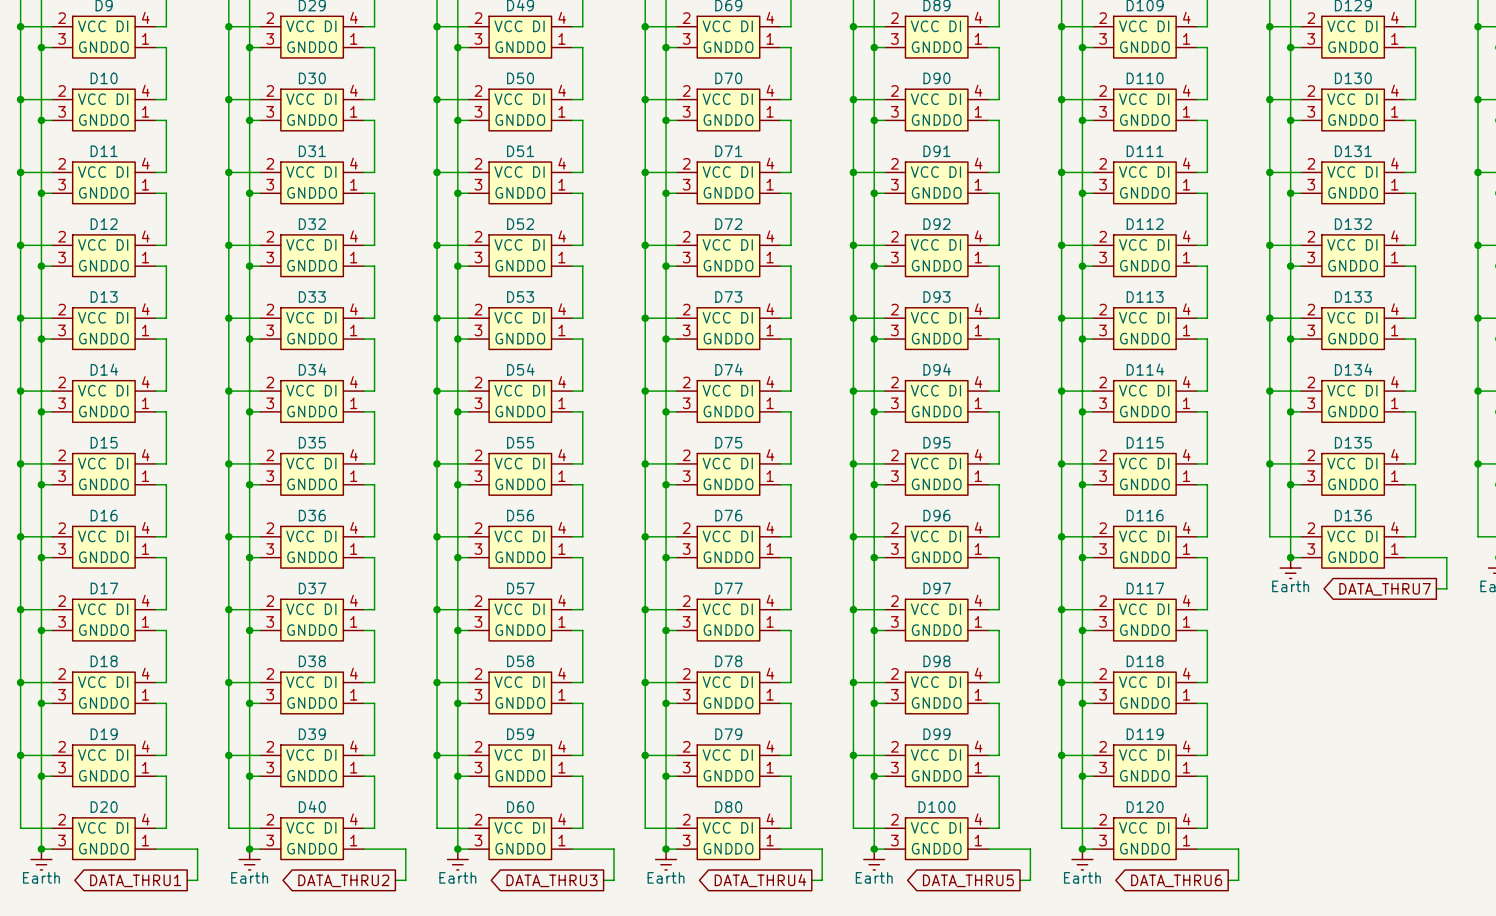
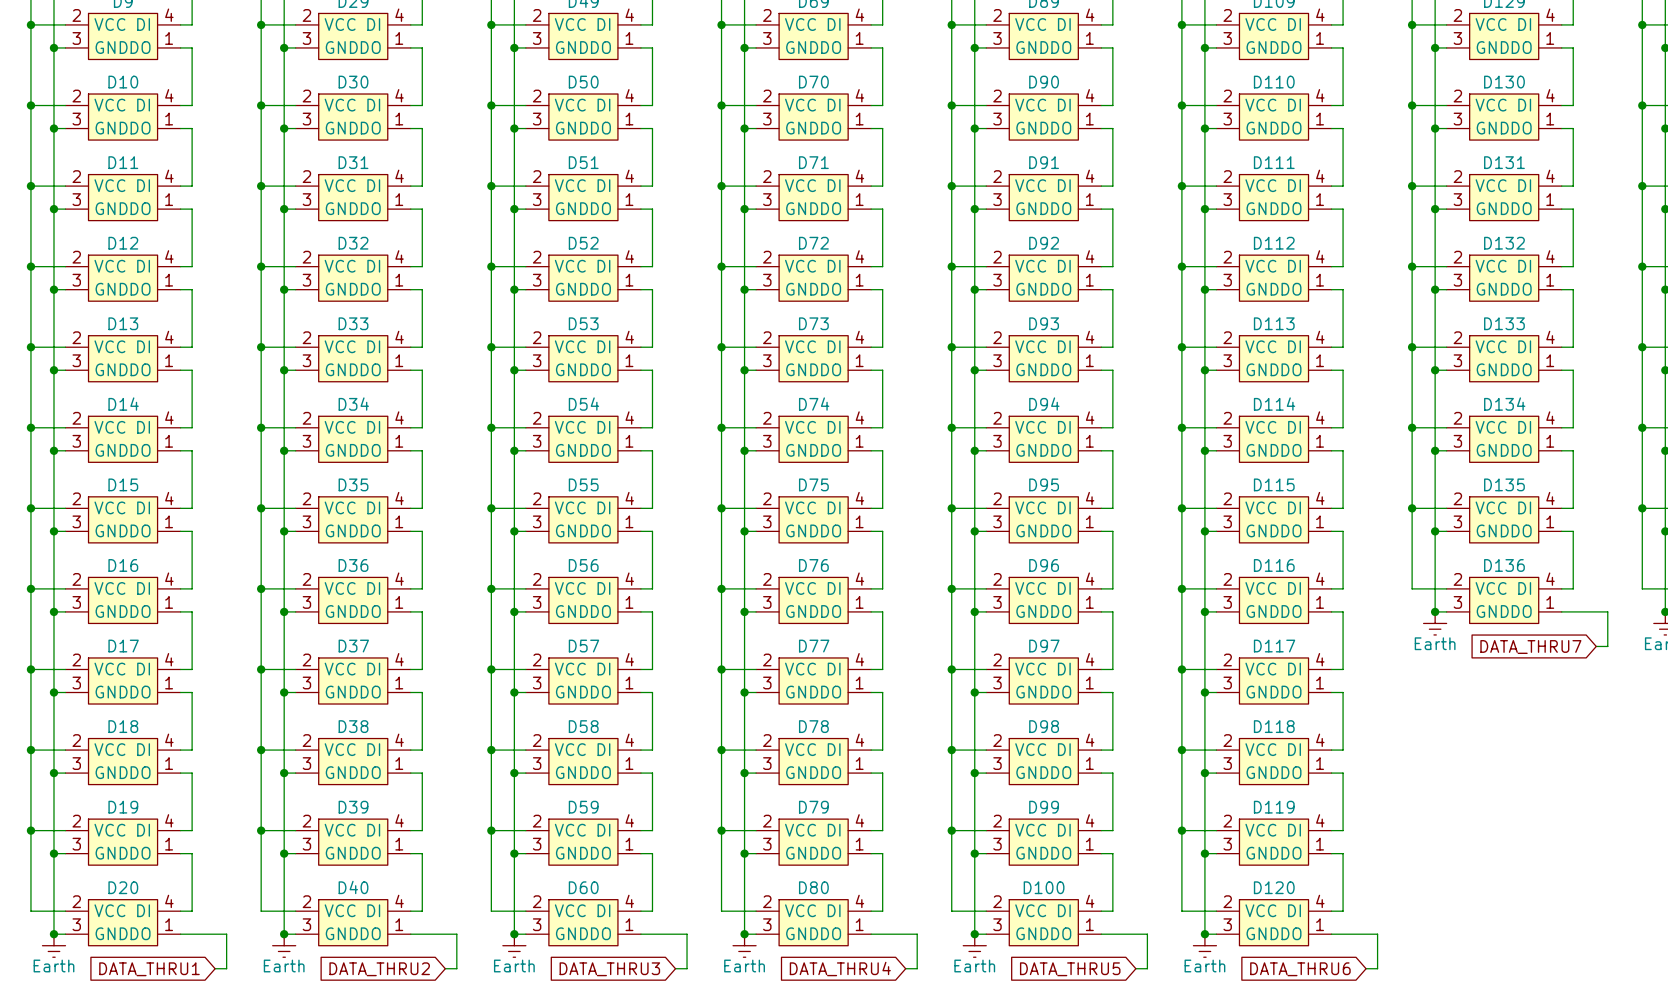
global label shape: output (1385, 589) -> input (1530, 647)
global label shape: output (135, 880) -> input (149, 969)
global label shape: output (343, 880) -> input (379, 969)
global label shape: output (552, 880) -> input (609, 969)
global label shape: output (760, 880) -> input (840, 969)
global label shape: output (968, 880) -> input (1070, 969)
global label shape: output (1176, 880) -> input (1300, 969)

